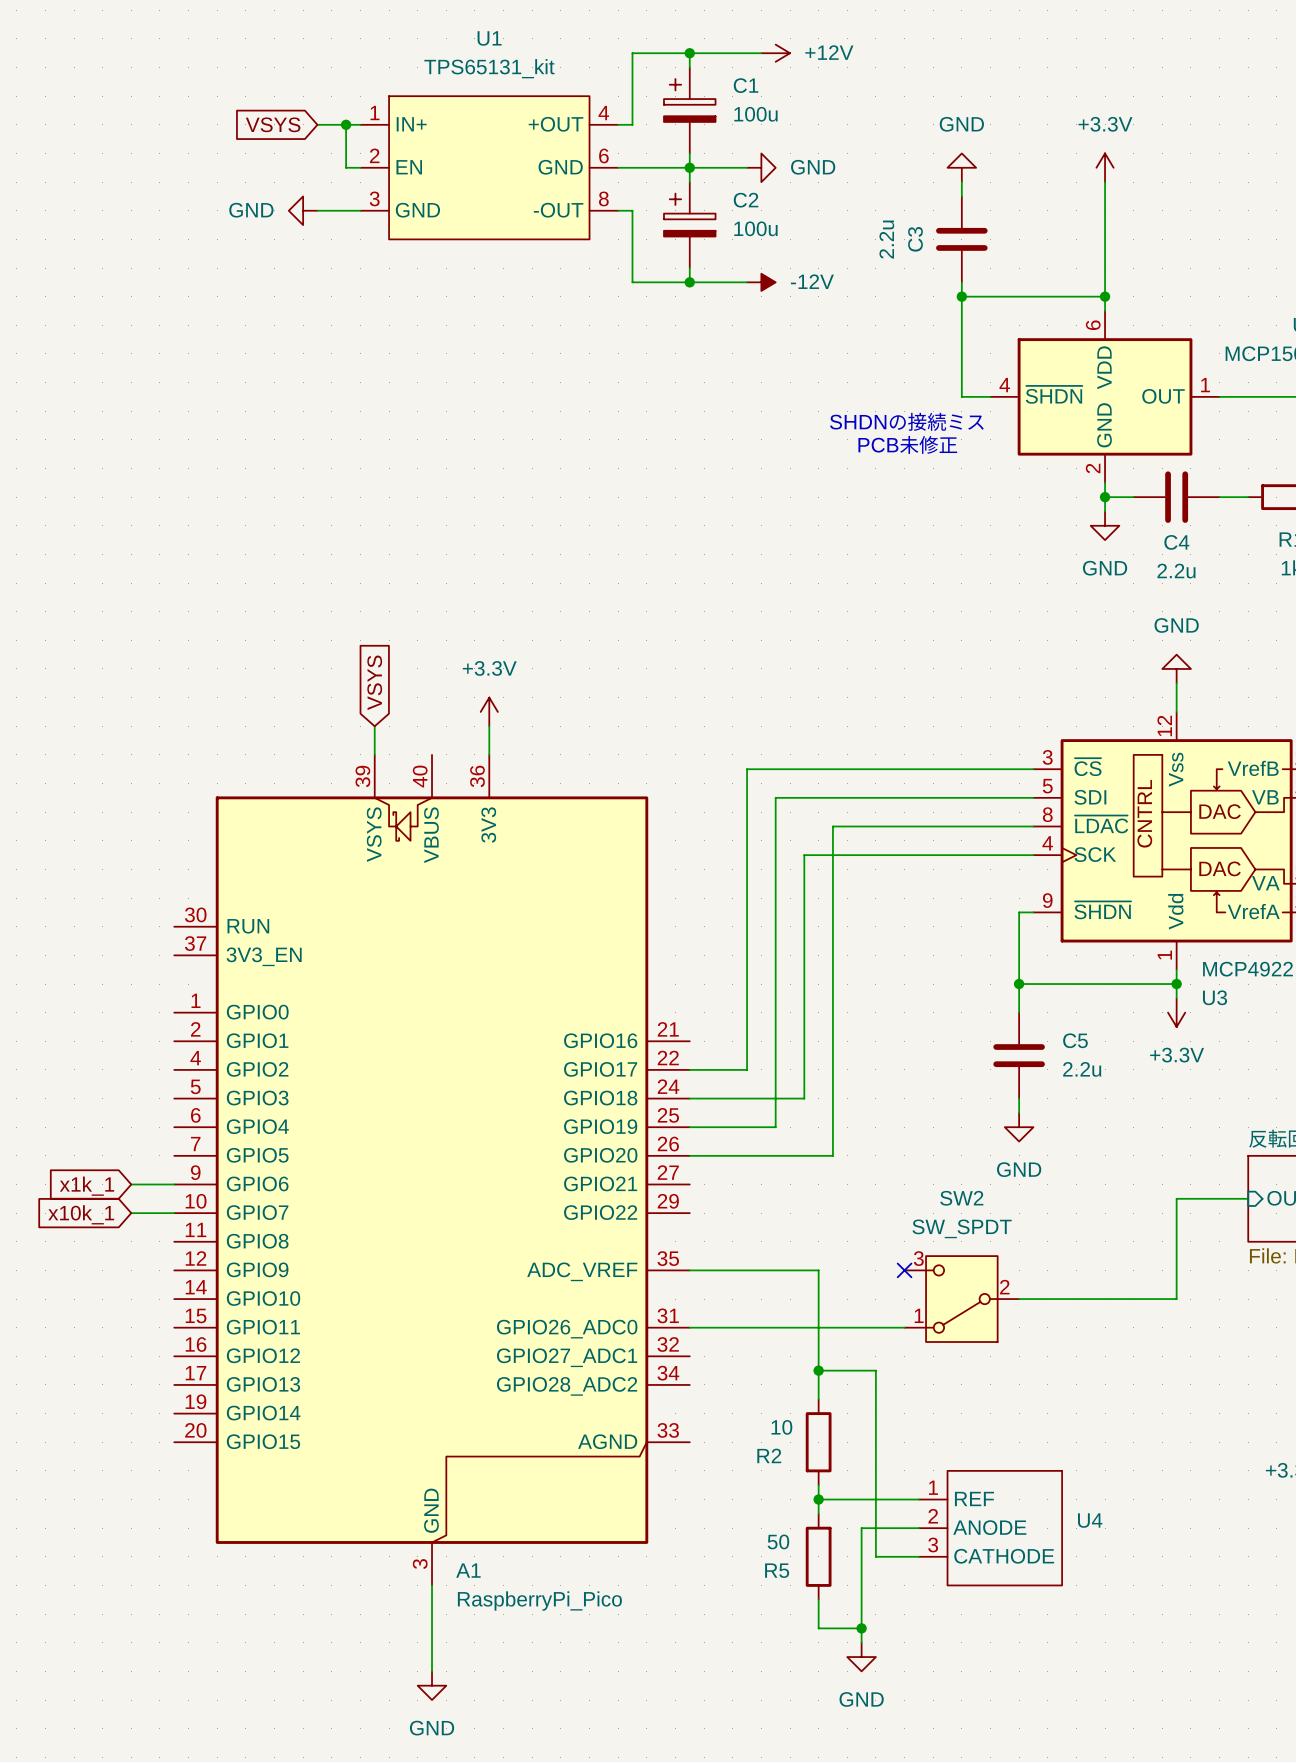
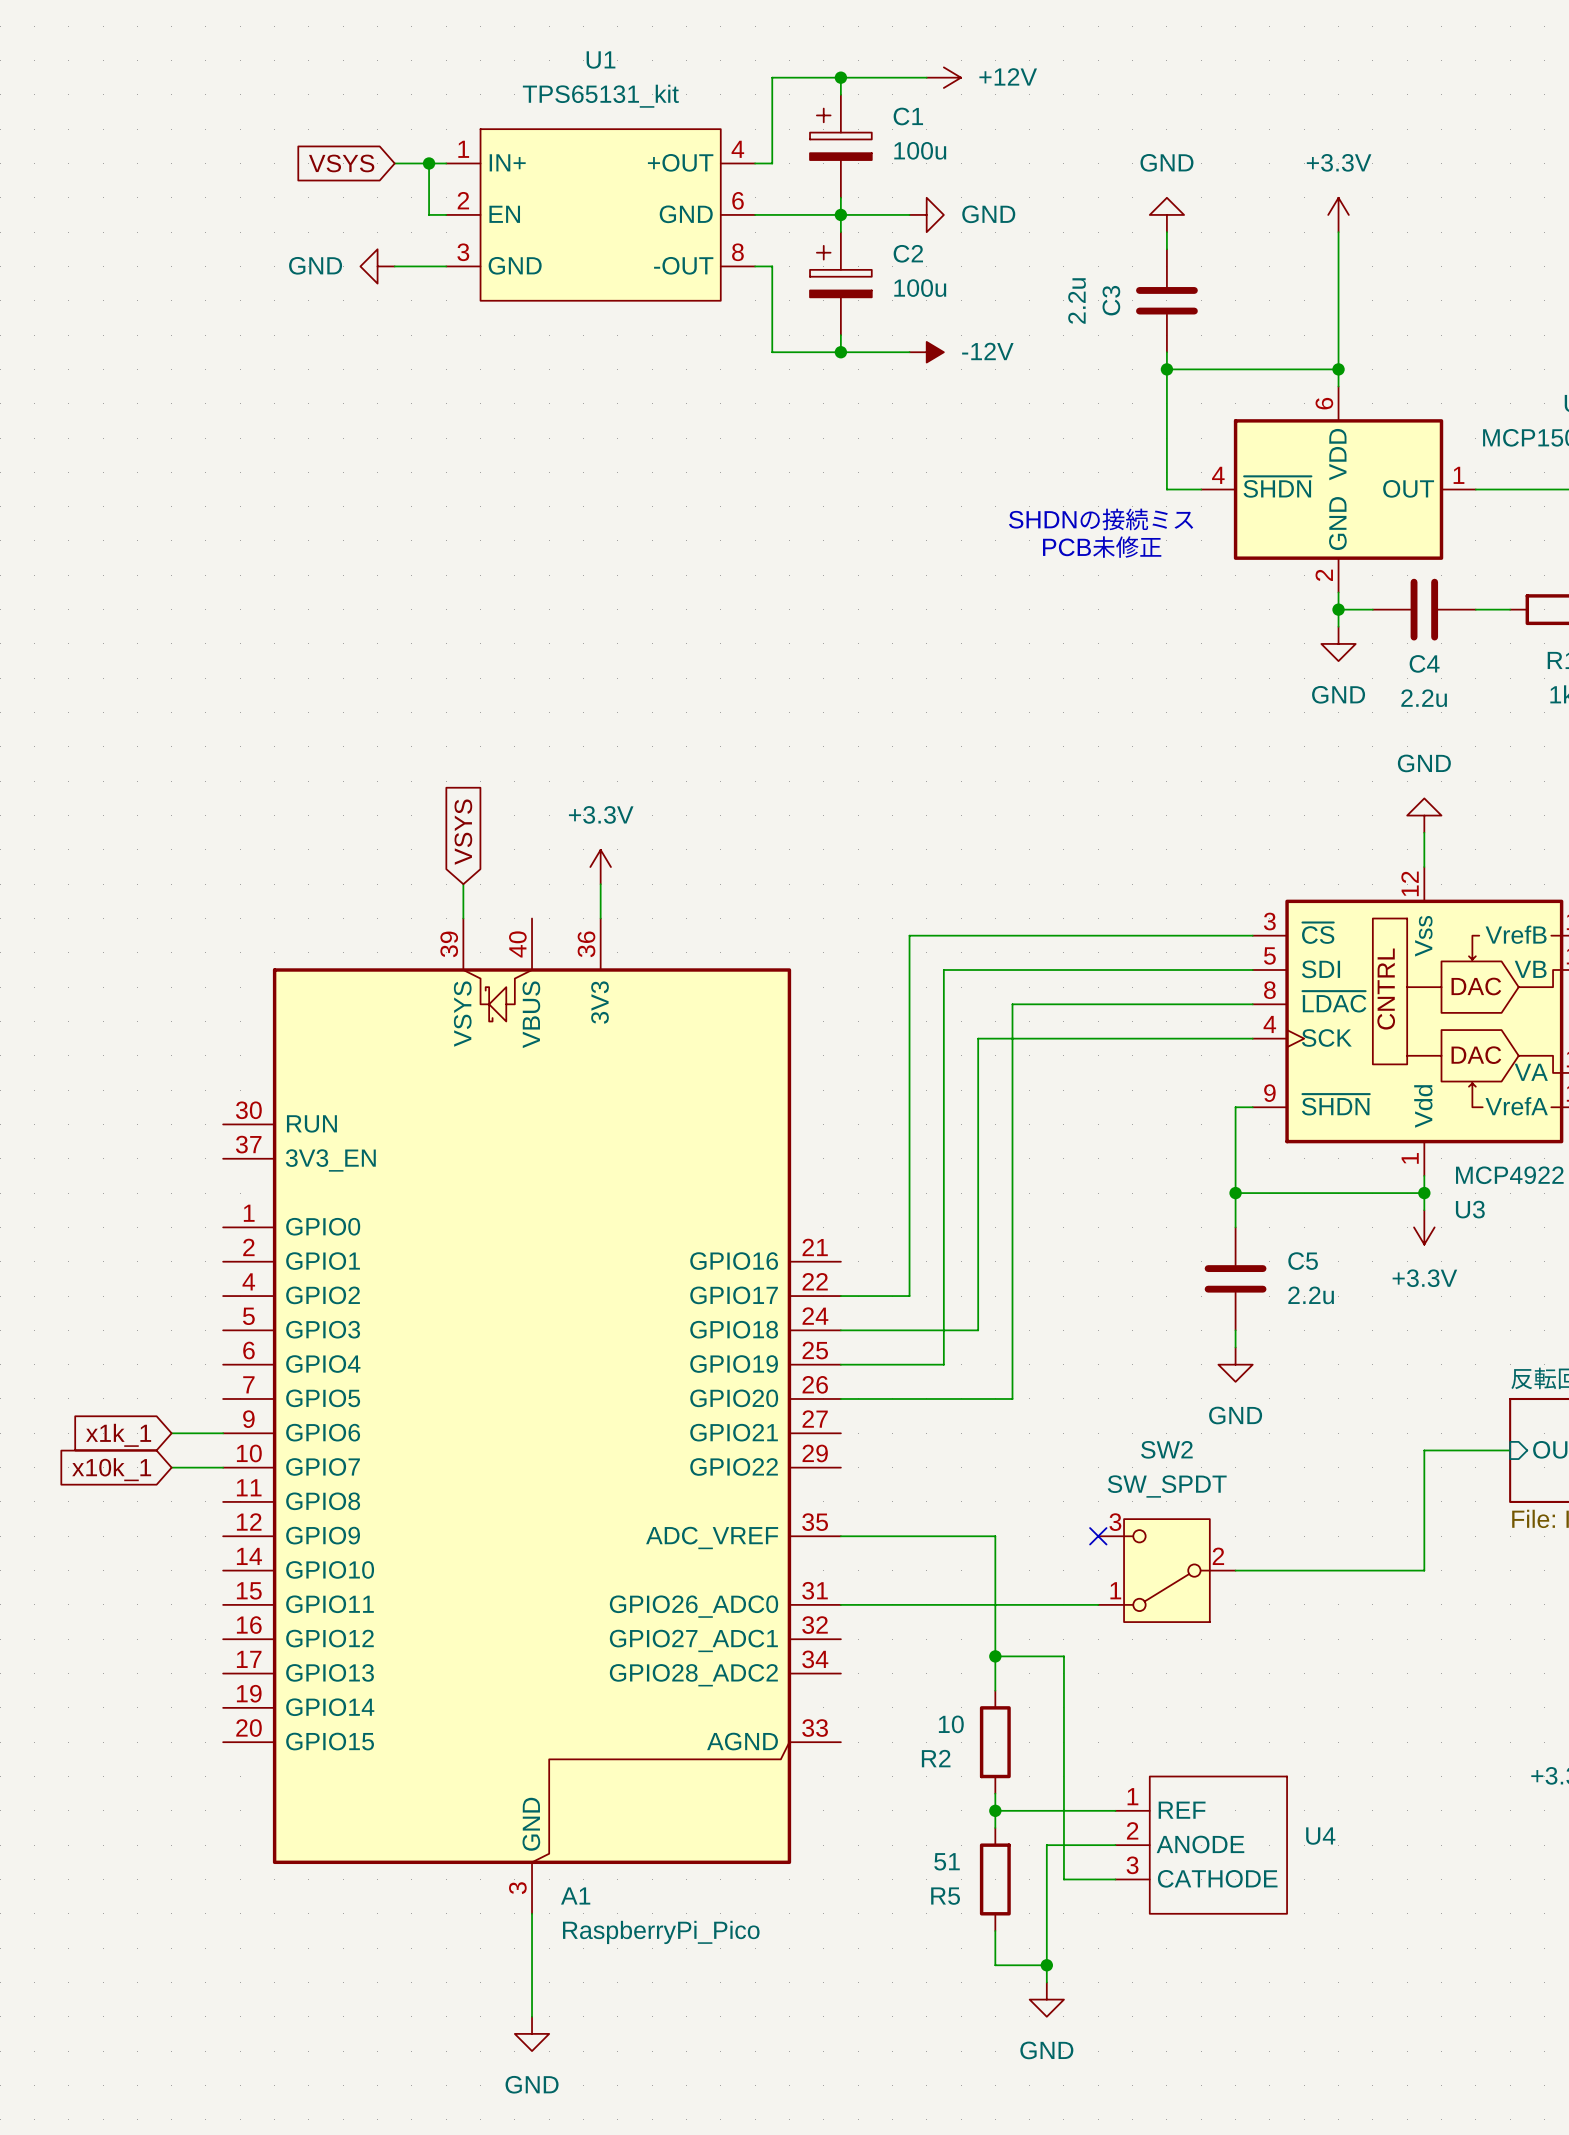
R5 value: 50 (778, 1541) -> 51 (947, 1861)

